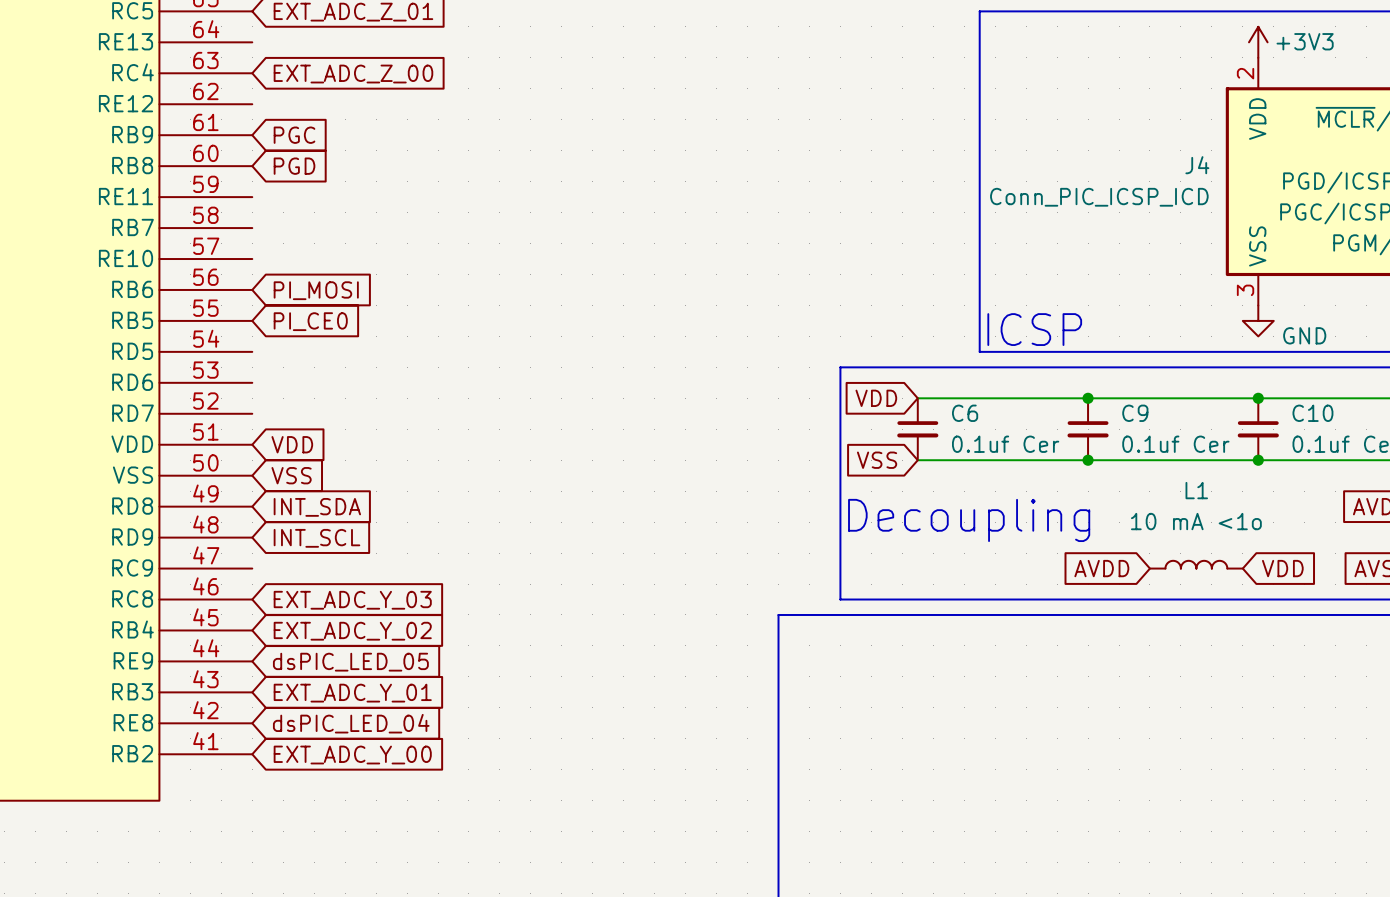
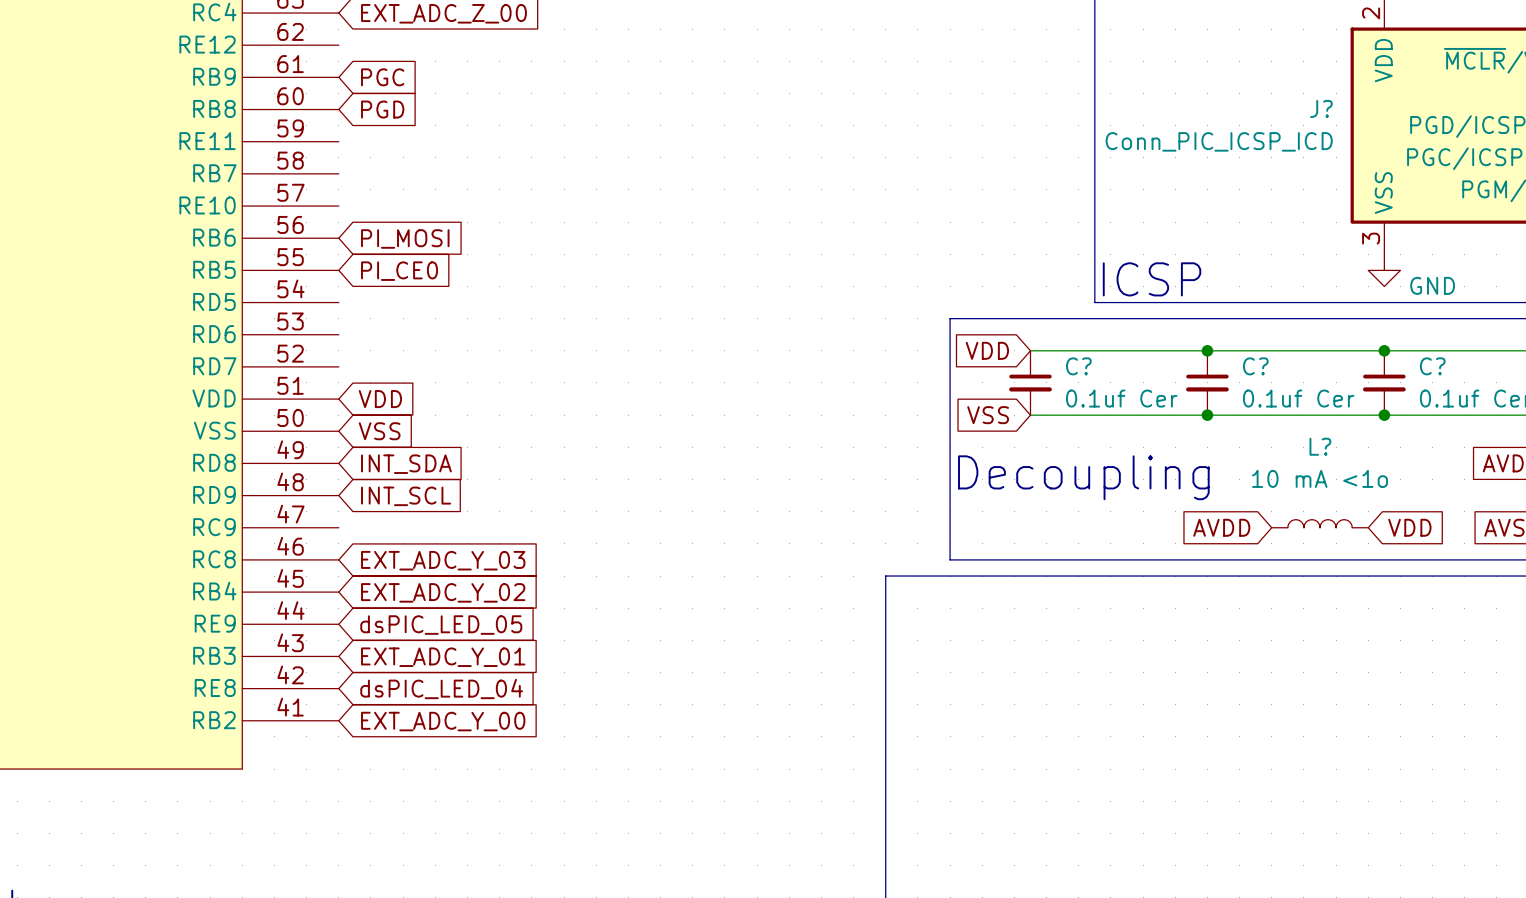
J4 name: J4 (1197, 165) -> J? (1321, 108)
C6 name: C6 (965, 413) -> C? (1078, 366)
C9 name: C9 (1135, 413) -> C? (1255, 366)
C10 name: C10 (1312, 413) -> C? (1432, 366)
L1 name: L1 (1196, 490) -> L? (1320, 446)

